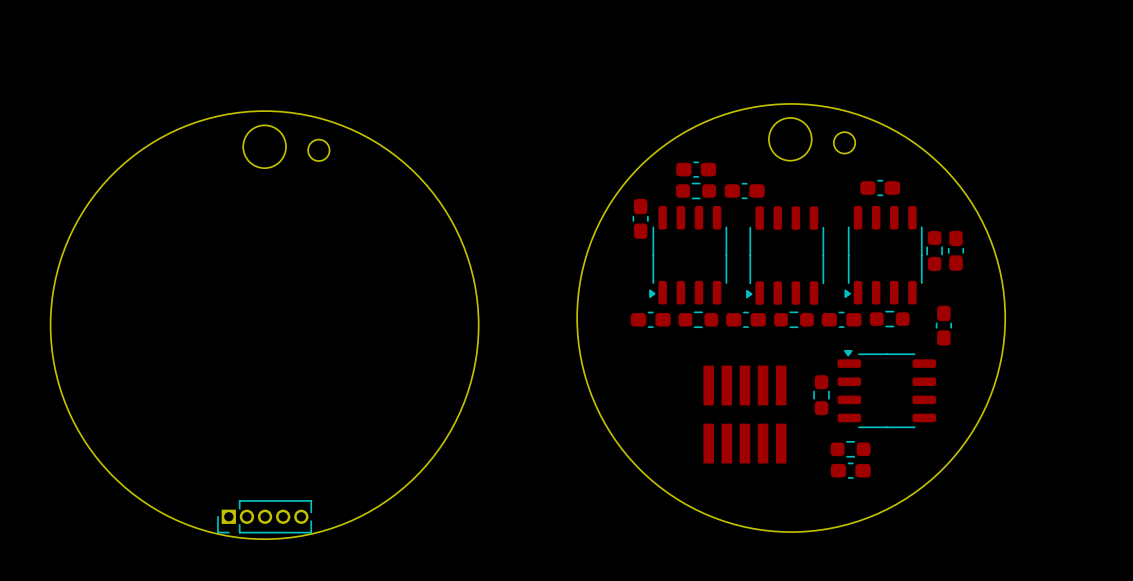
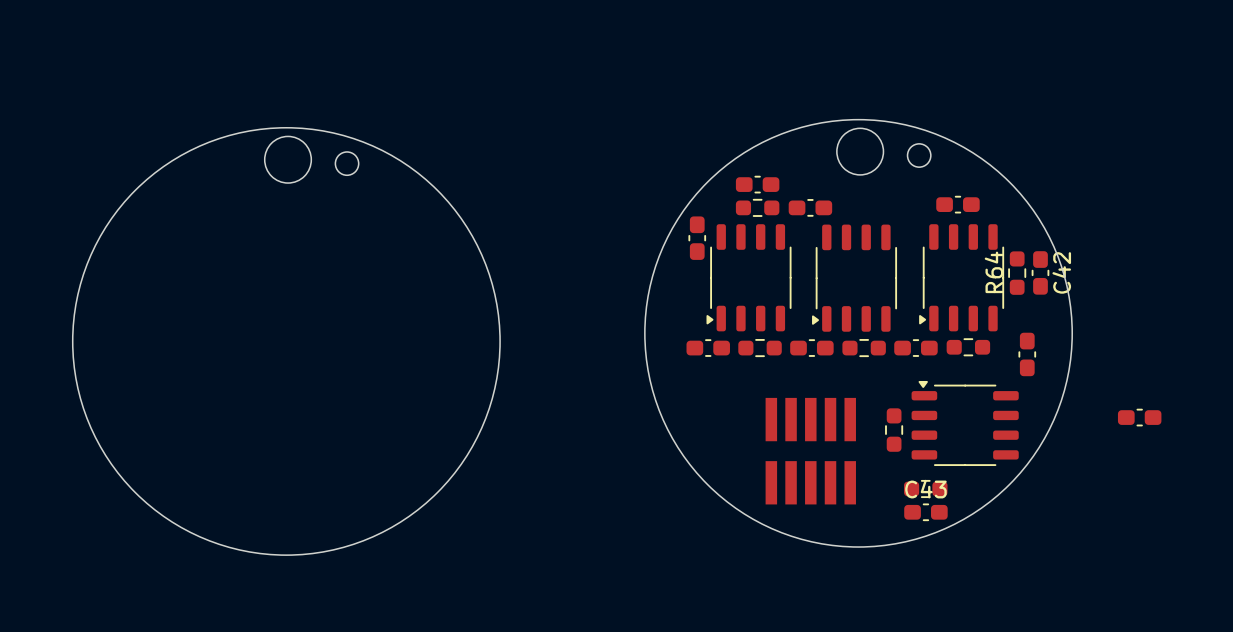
round board edge size: [576, 103, 1006, 533] -> [644, 118, 1073, 548]
round board edge size: [49, 110, 480, 540] -> [71, 127, 501, 556]
R64 name: none -> R64 (994, 272)
C42 name: none -> C42 (1061, 272)
part: none -> (1139, 417)
C43 name: none -> C43 (925, 489)
part: (264, 516) -> none

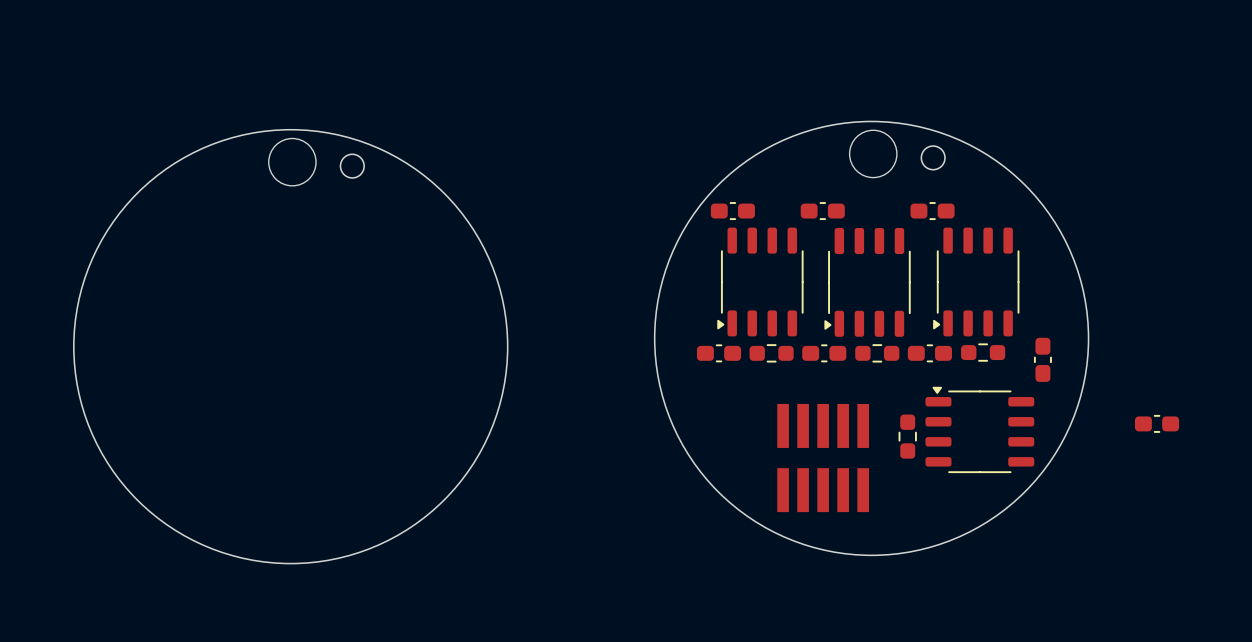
part: (757, 184) -> none
part position: (957, 204) -> (932, 211)
part: none -> (732, 211)
part: (757, 207) -> none
part: (697, 238) -> none
C42: (1040, 272) -> none
R64: (1017, 273) -> none
part: (925, 488) -> none
C43: (925, 512) -> none

